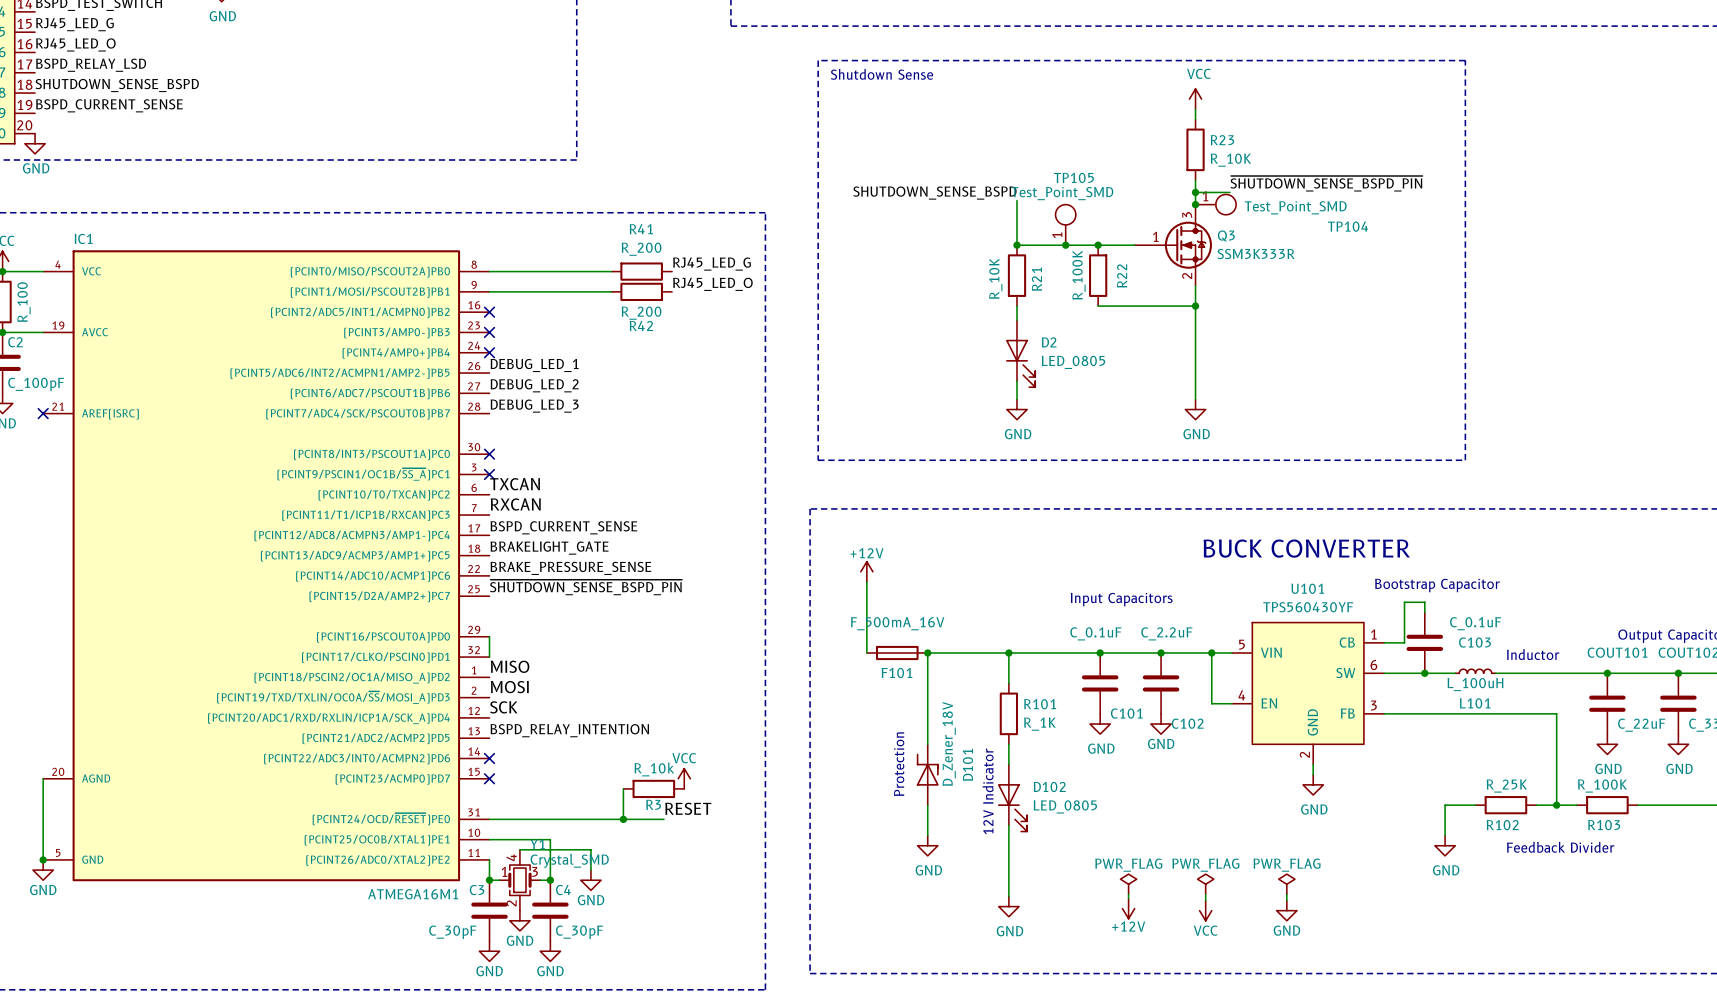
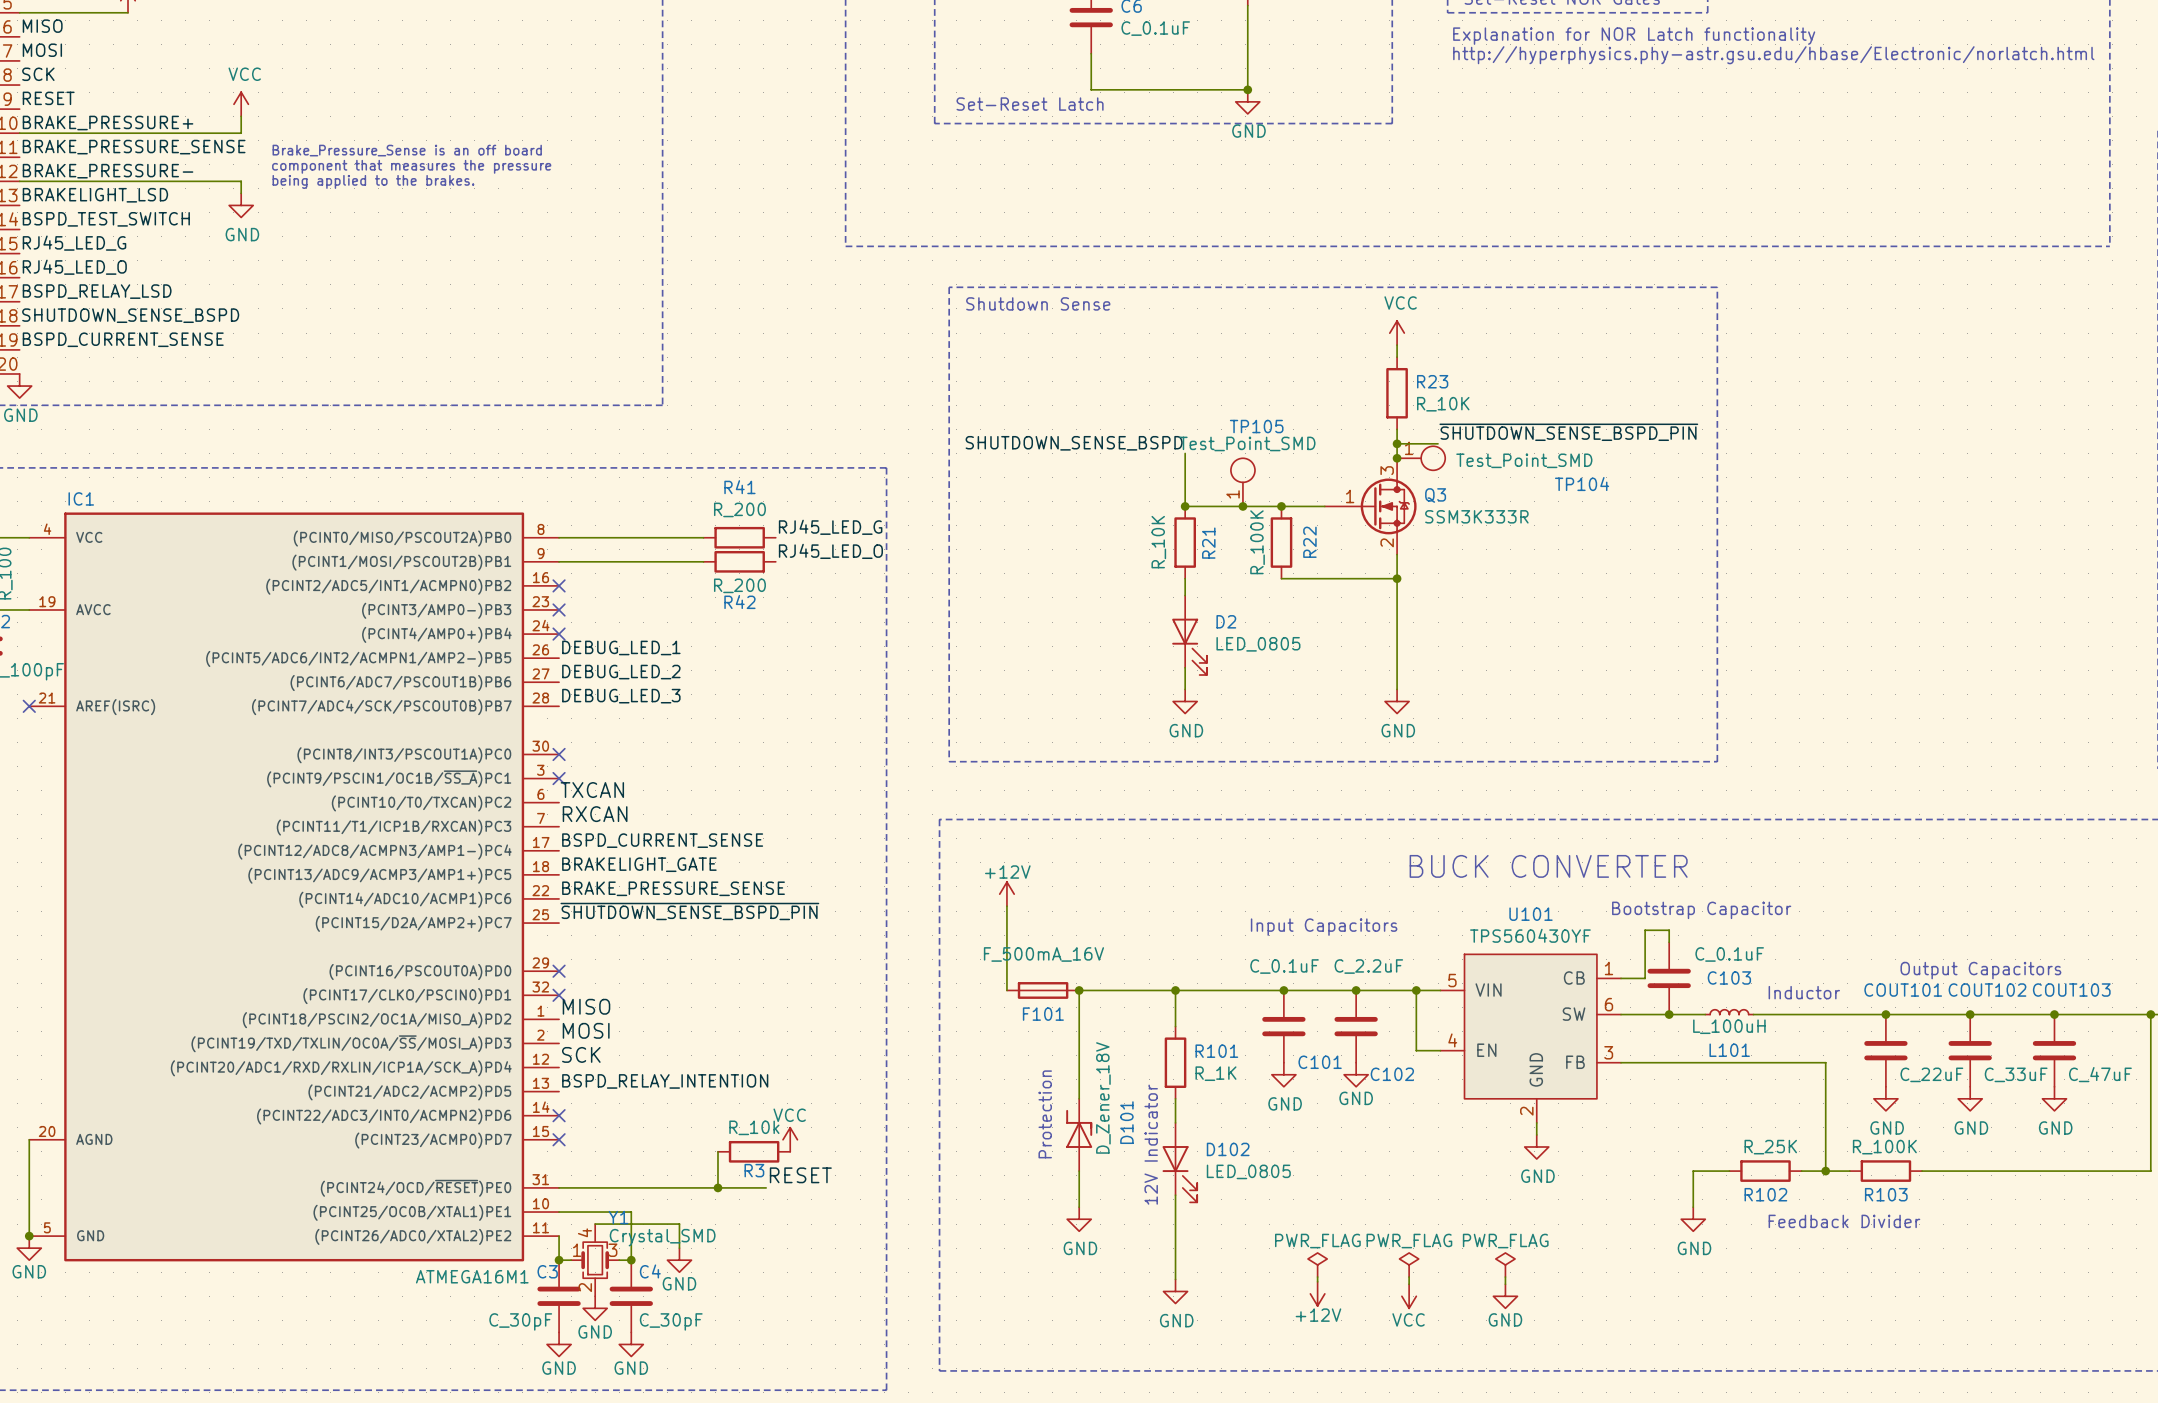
wire: (489, 636) (489, 657) -> none
no-connect mark: none -> (559, 971)
no-connect mark: none -> (559, 995)

